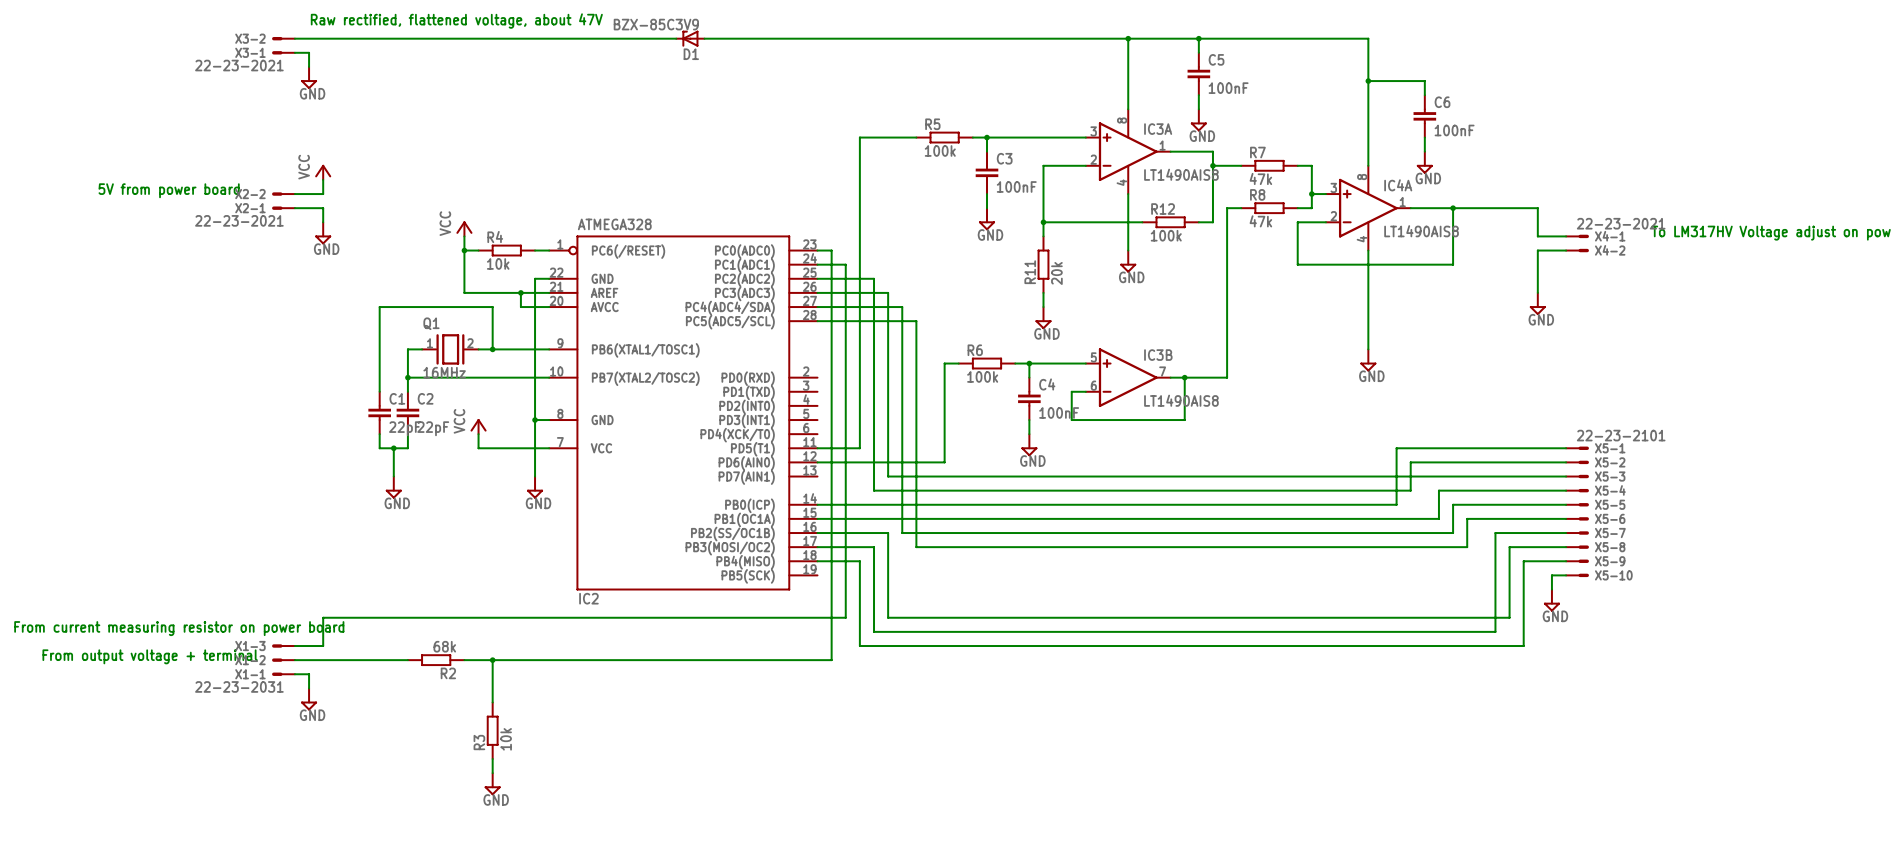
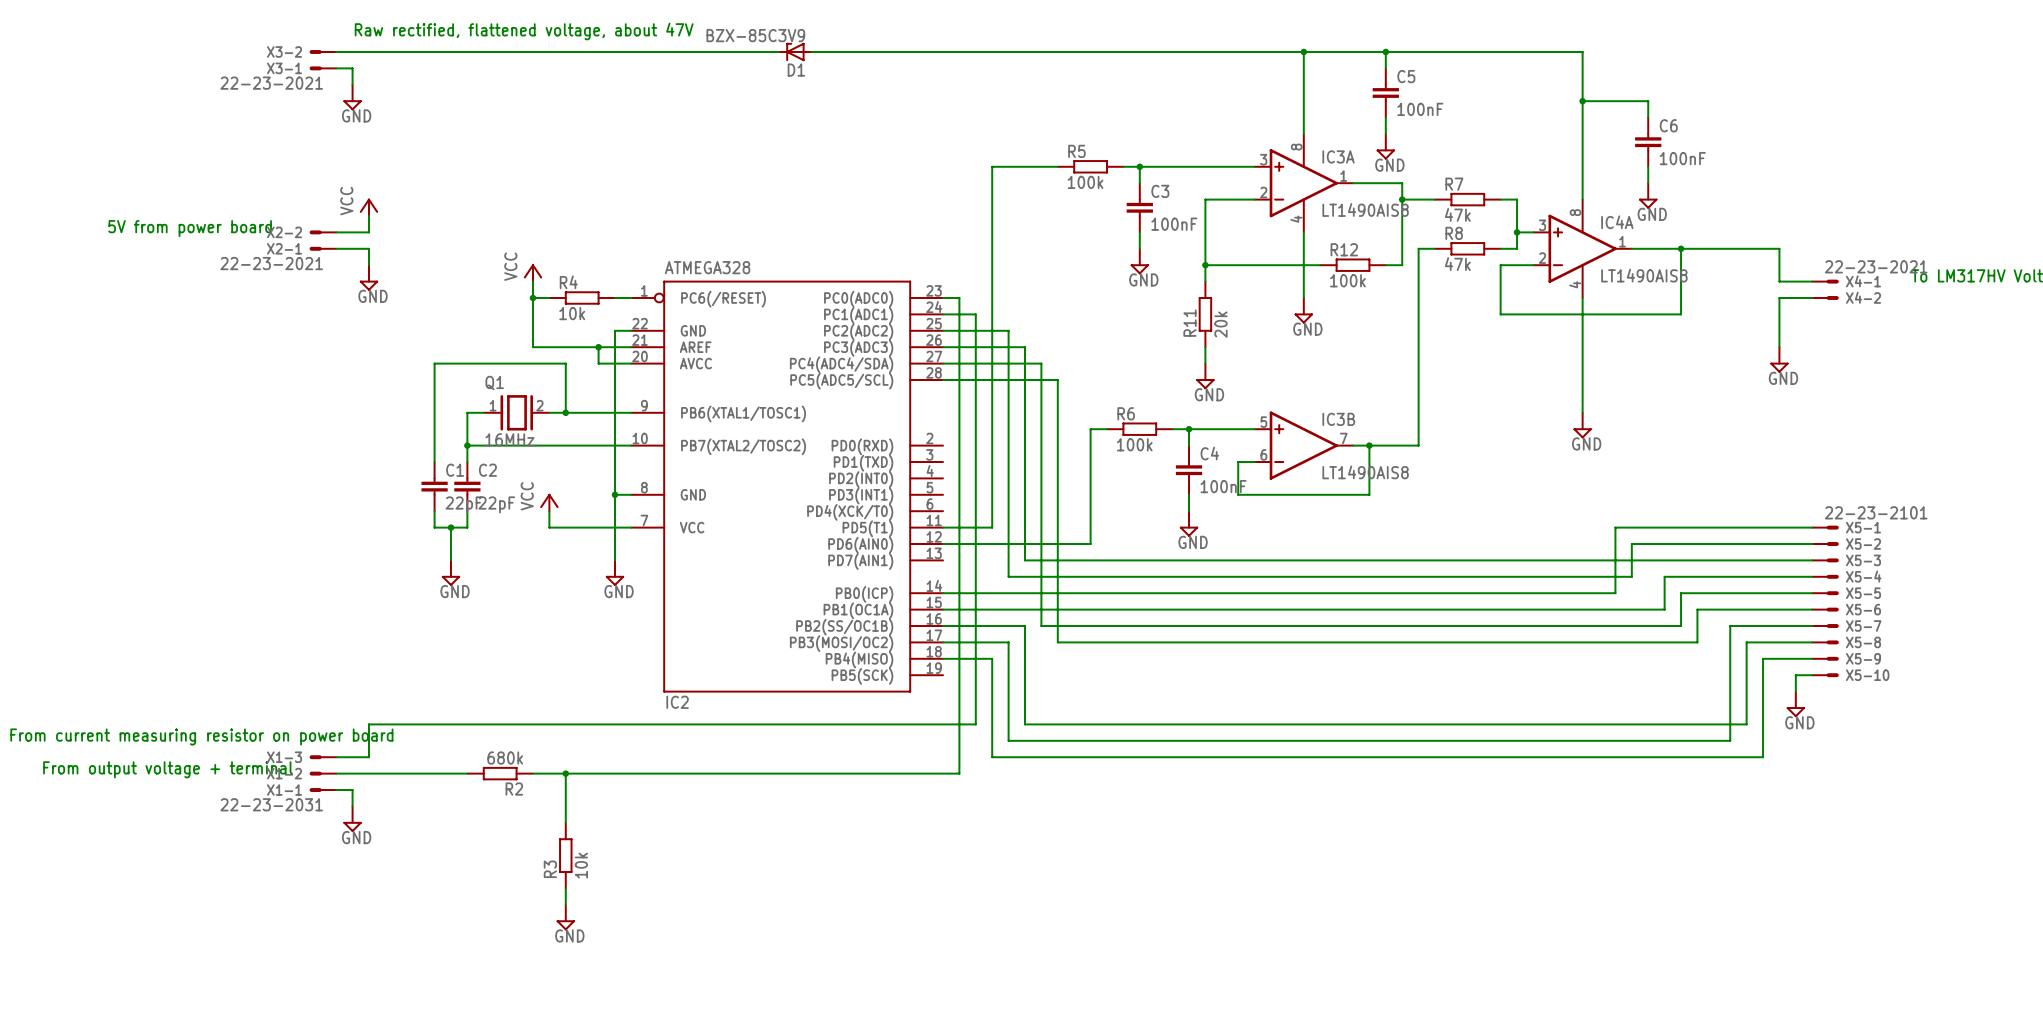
R2 value: 68k (444, 646) -> 680k (505, 758)

